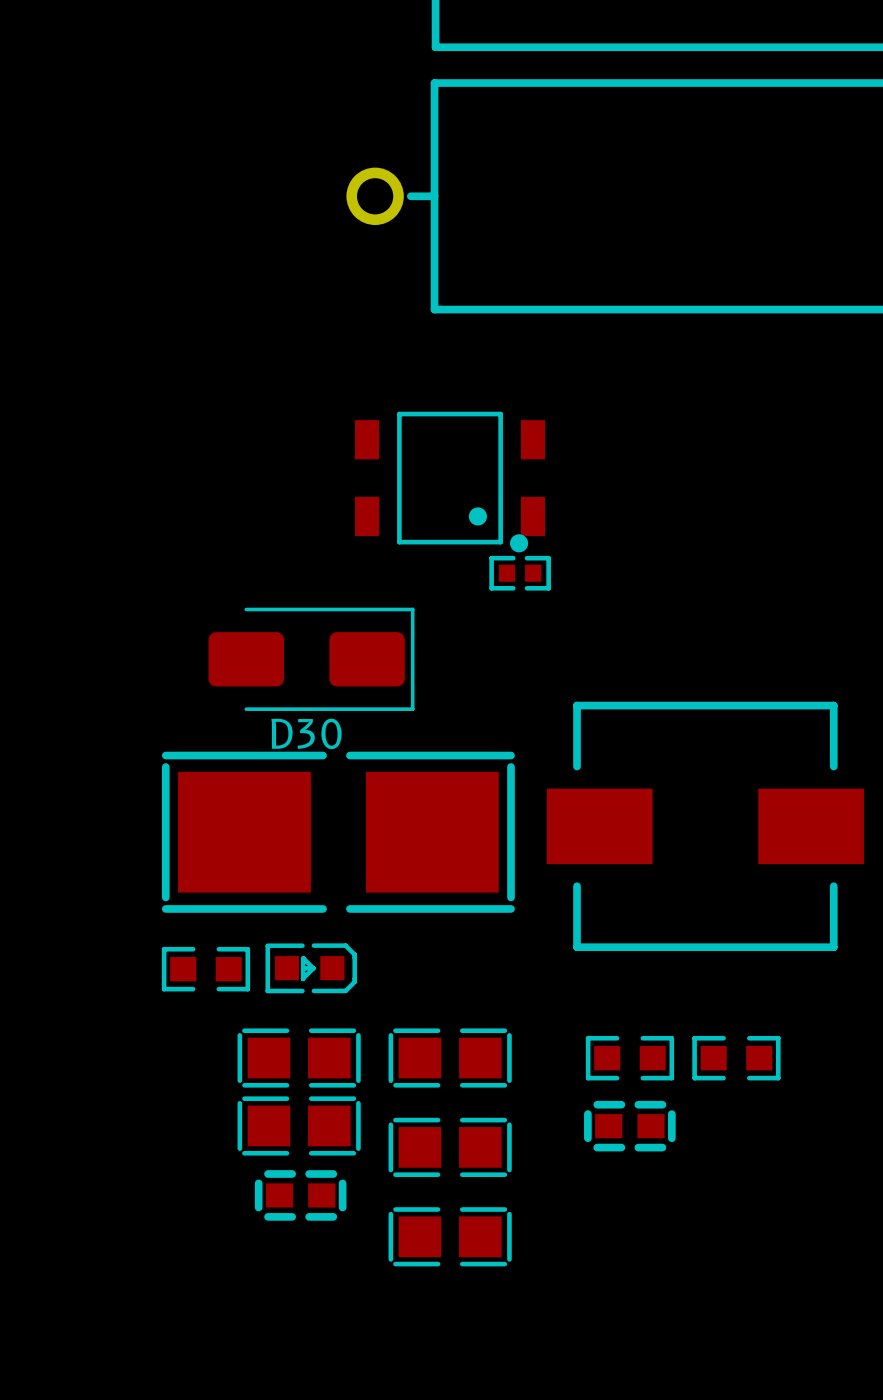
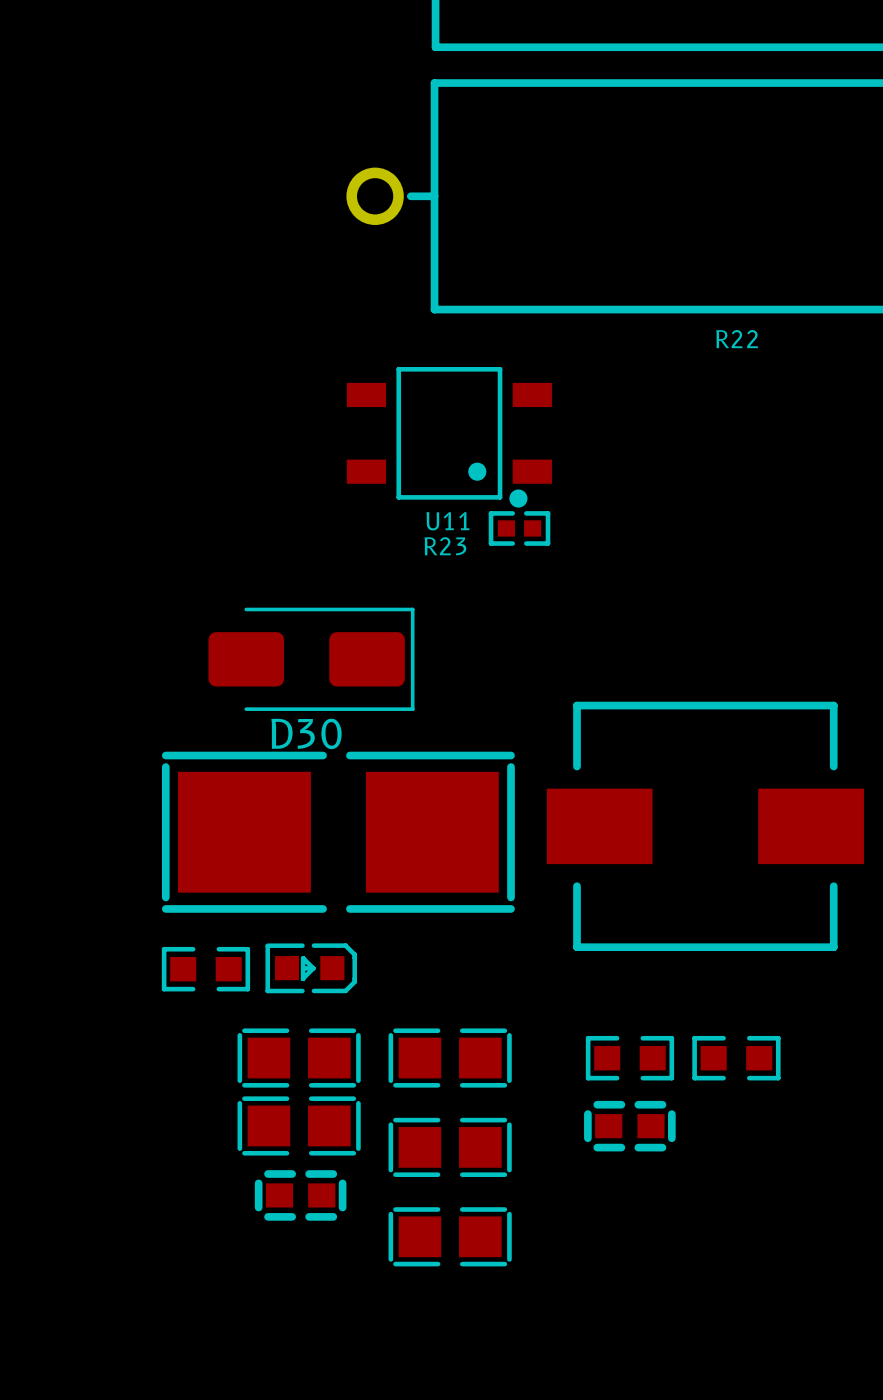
R22 name: none -> R22 (737, 339)
U11: none -> (449, 437)
part: (450, 482) -> none
R23: none -> (519, 528)
part: (520, 573) -> none

